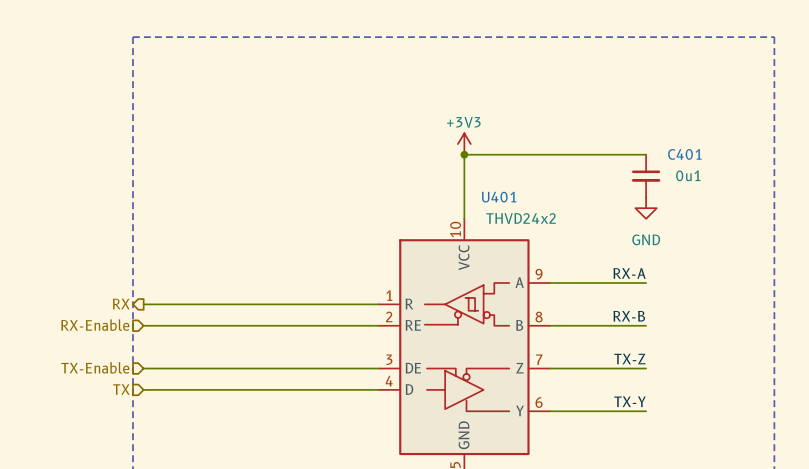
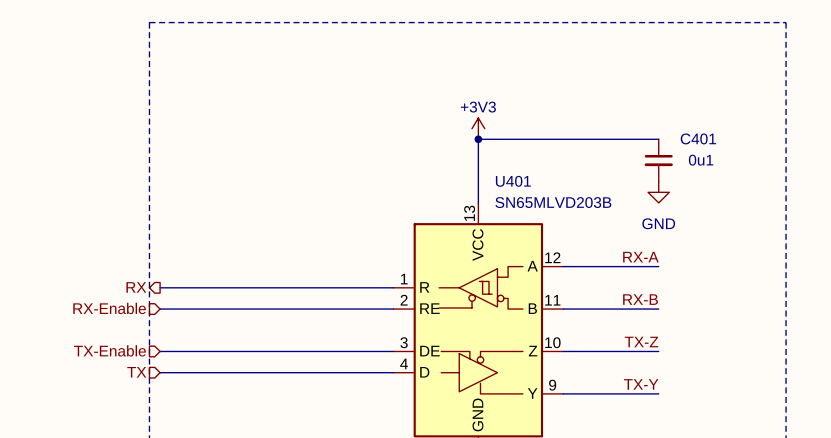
U401 value: THVD24x2 (521, 218) -> SN65MLVD203B (553, 202)
U401 pin number: 10 (455, 229) -> 13 (469, 213)
U401 pin number: 9 (539, 274) -> 12 (552, 257)
U401 pin number: 8 (539, 317) -> 11 (552, 300)
U401 pin number: 7 (539, 359) -> 10 (552, 342)
U401 pin number: 6 (539, 402) -> 9 (552, 385)

